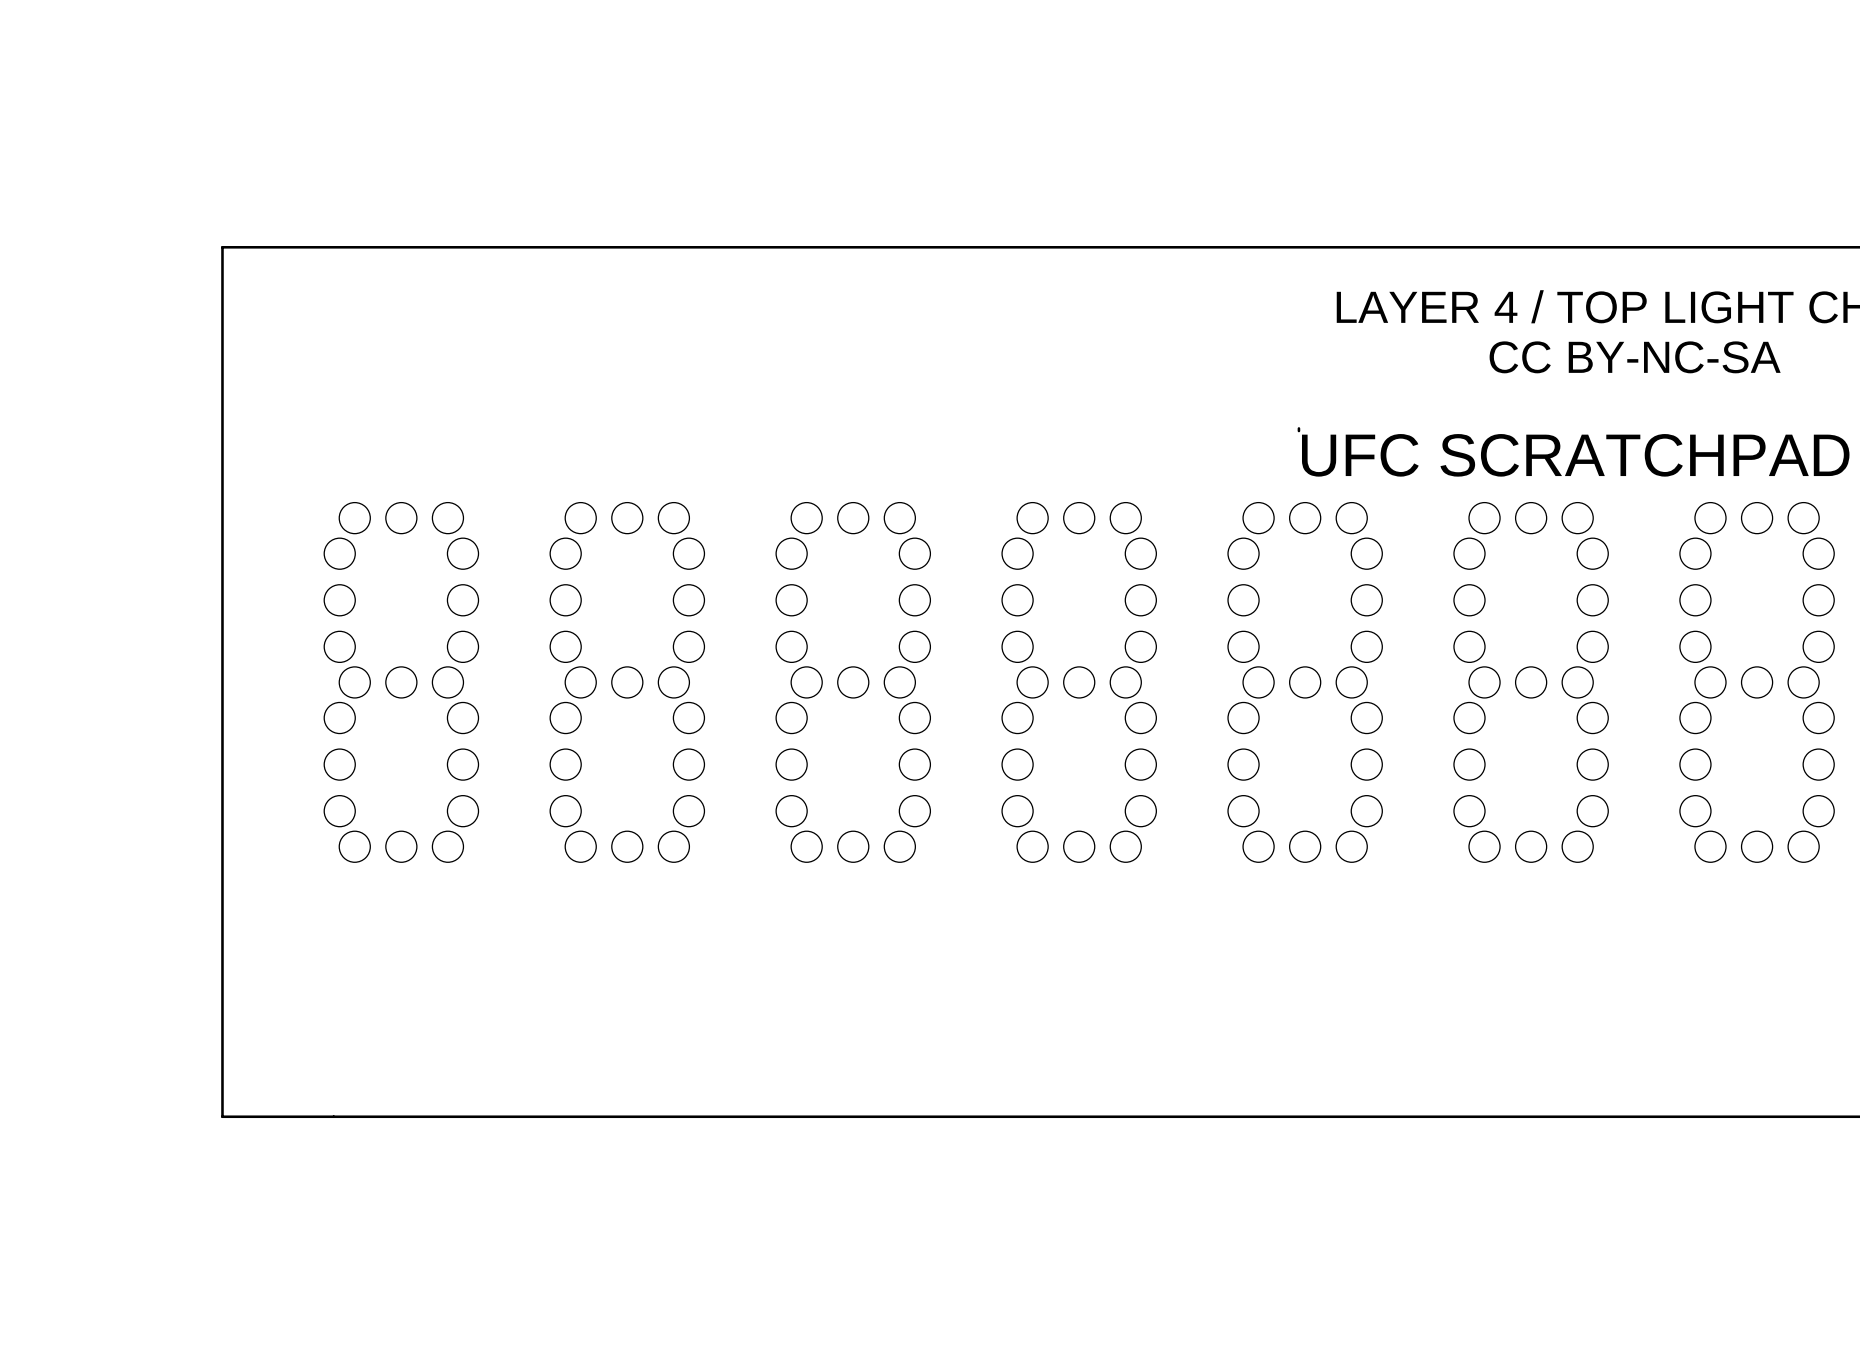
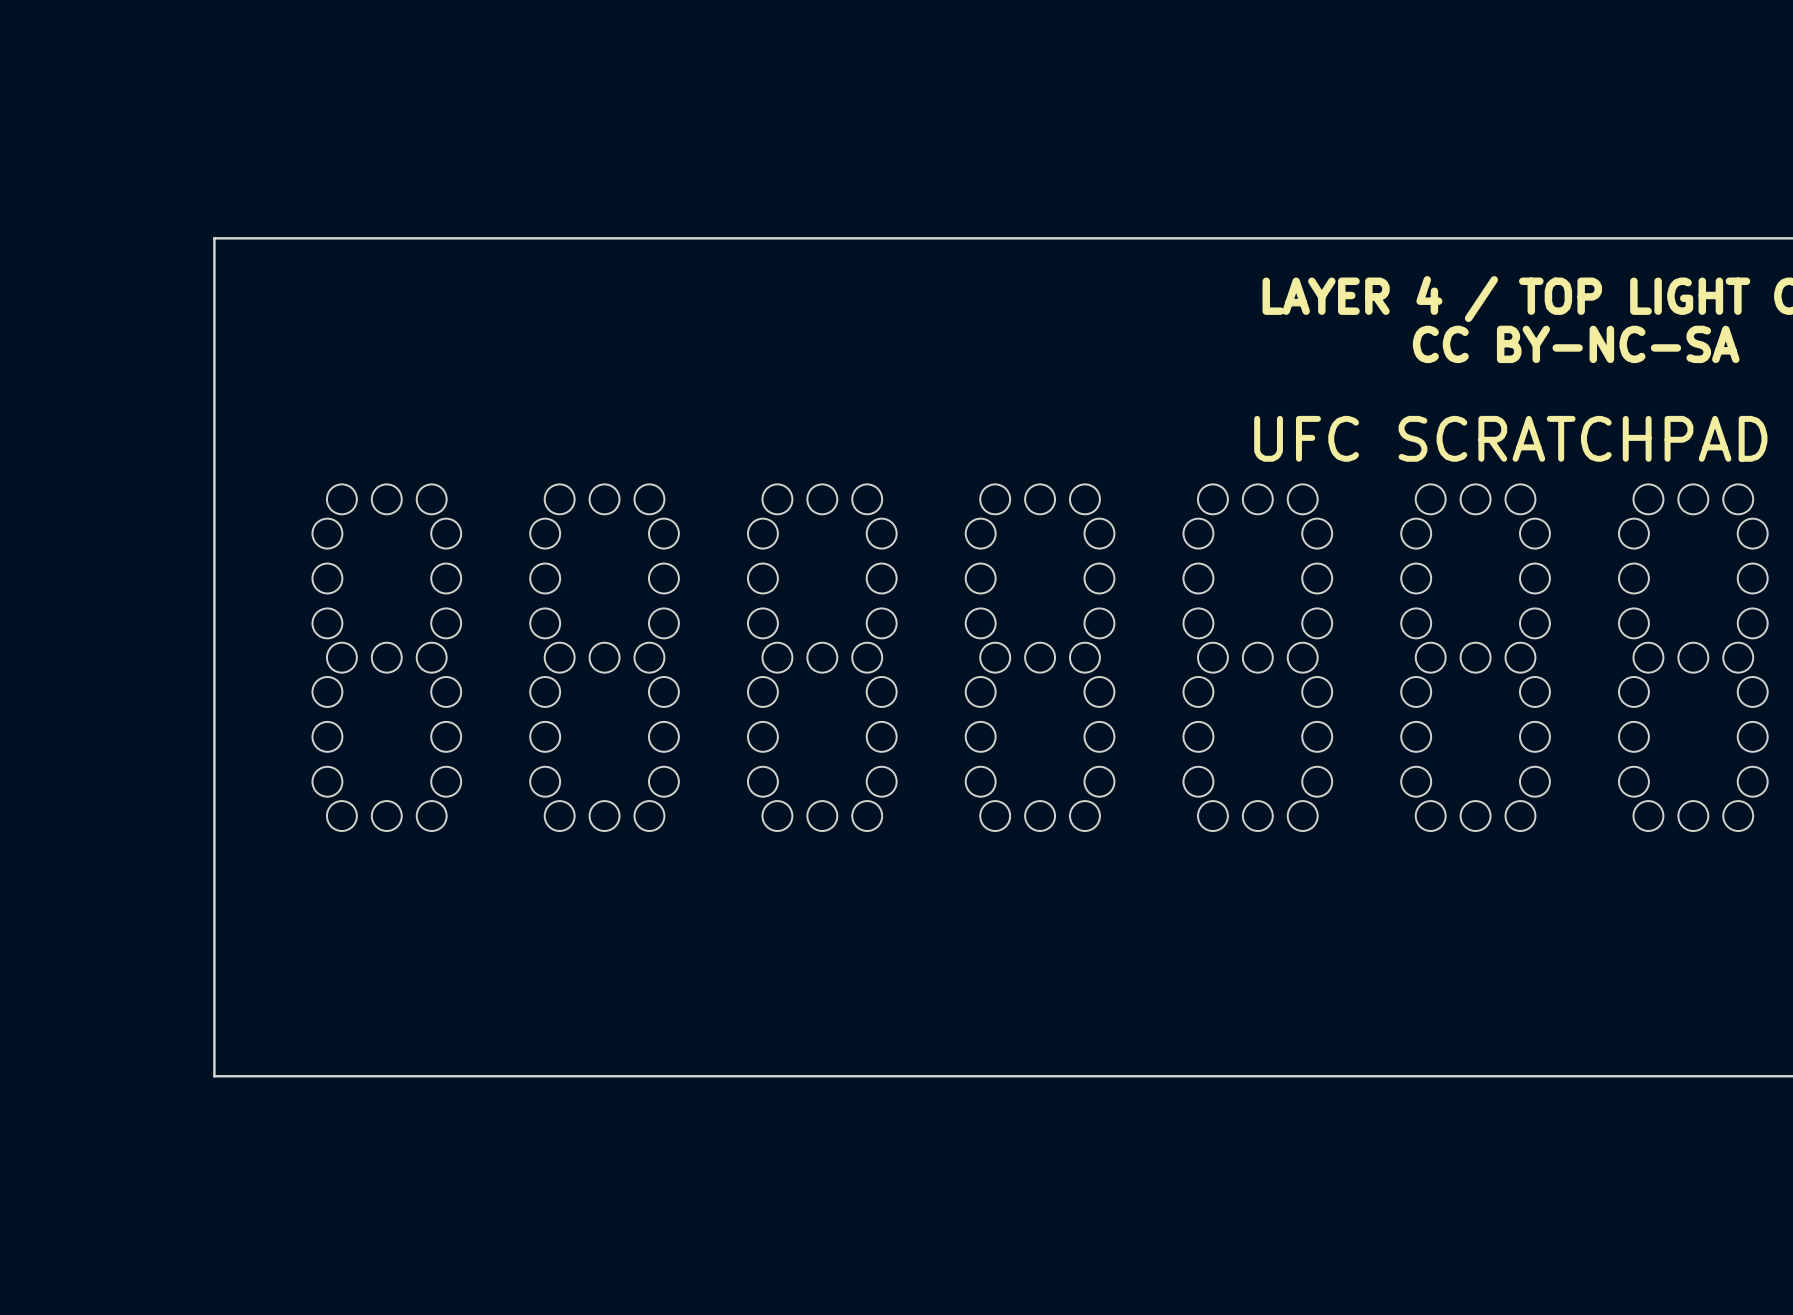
board edge: (1298, 428) (1298, 431) -> none

